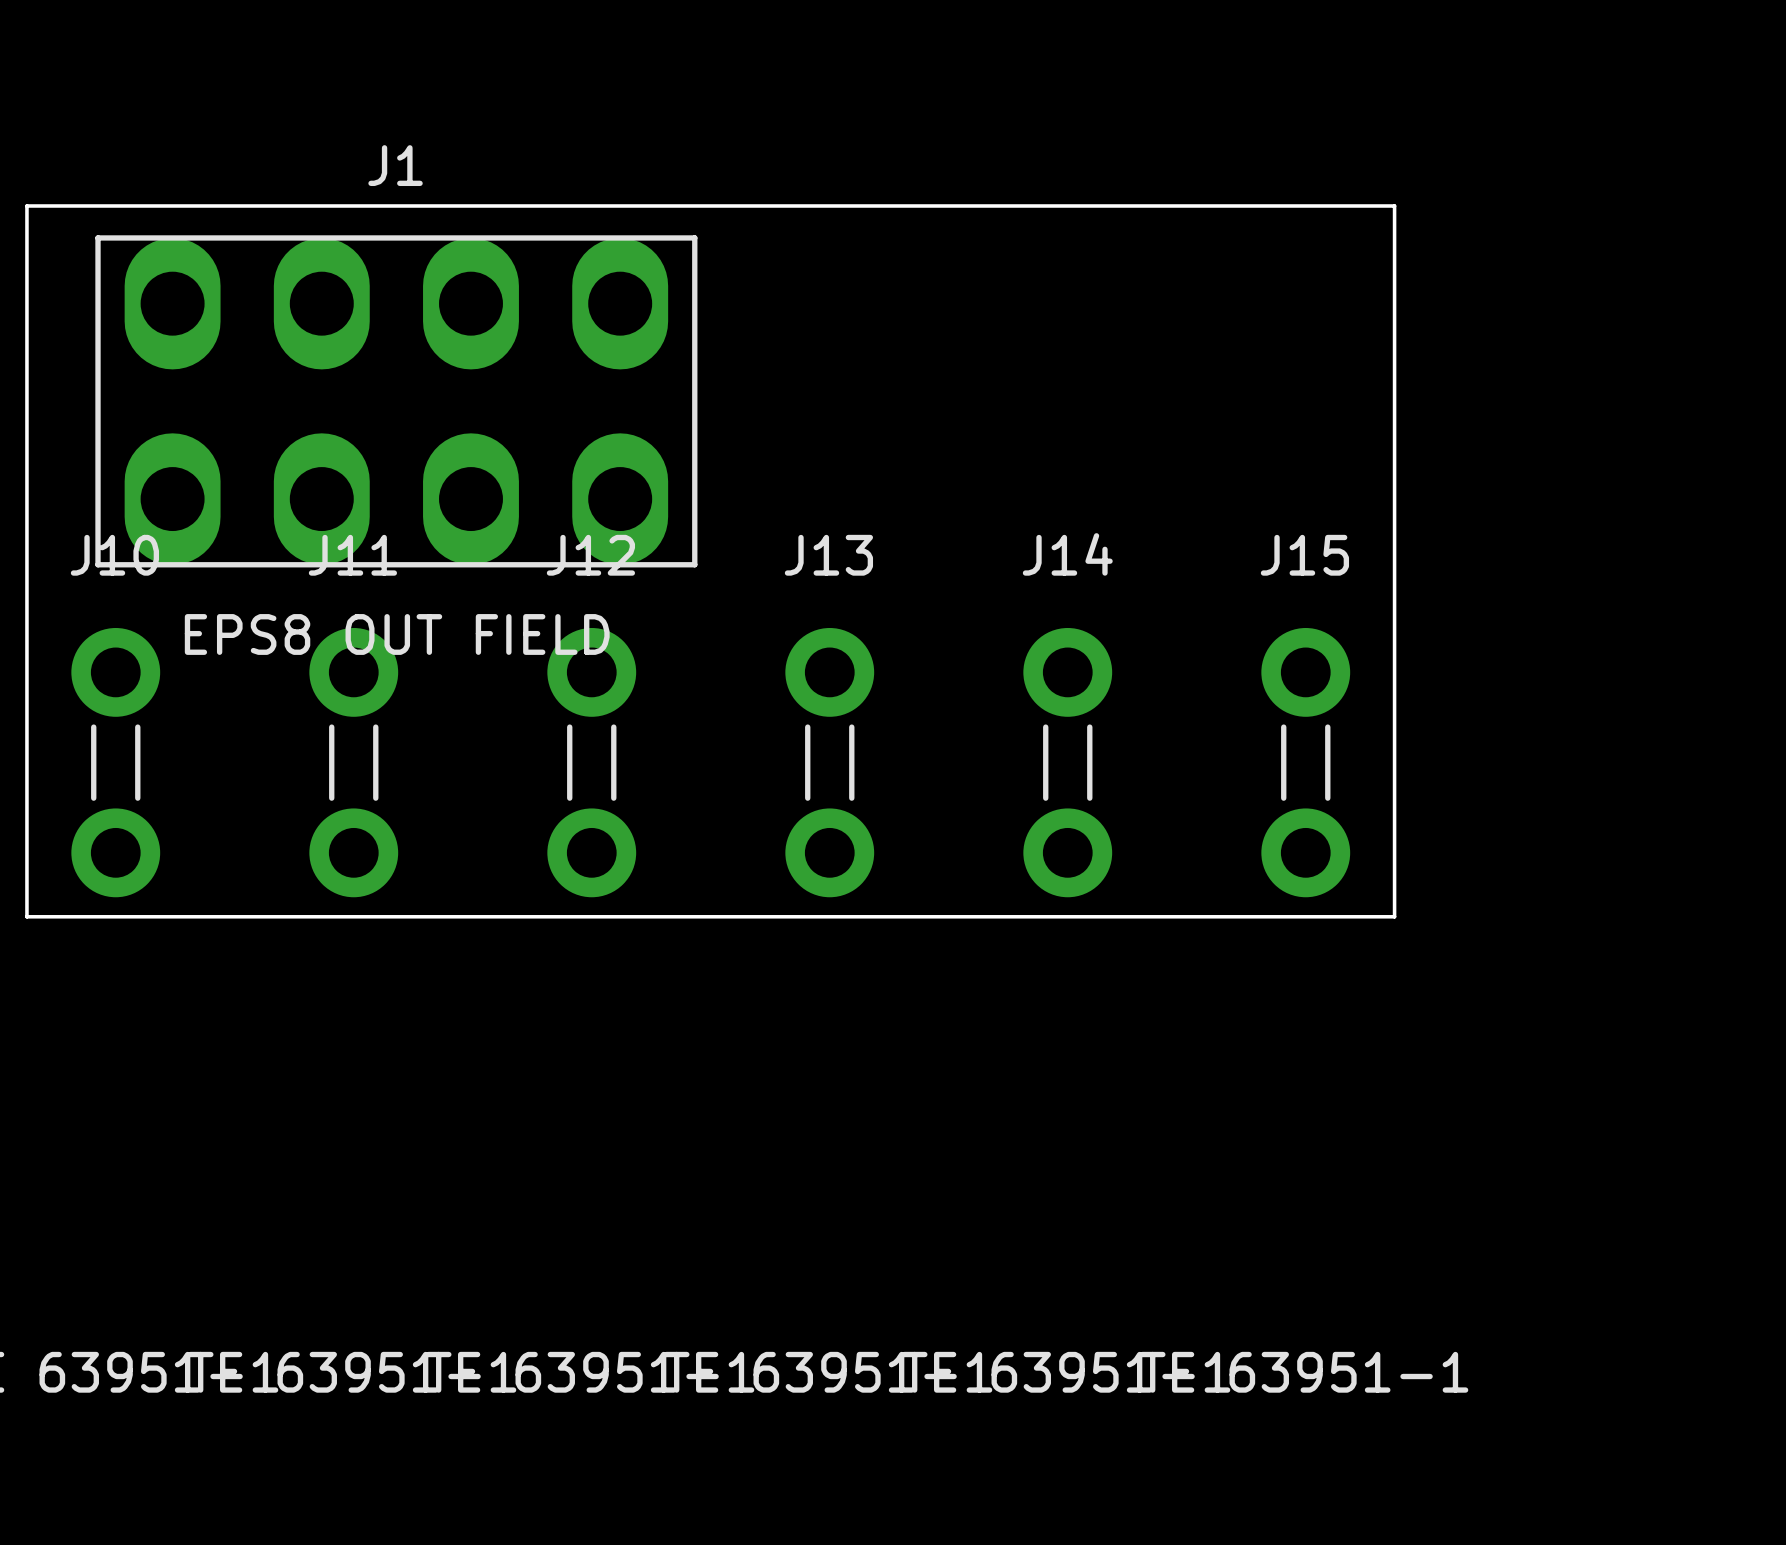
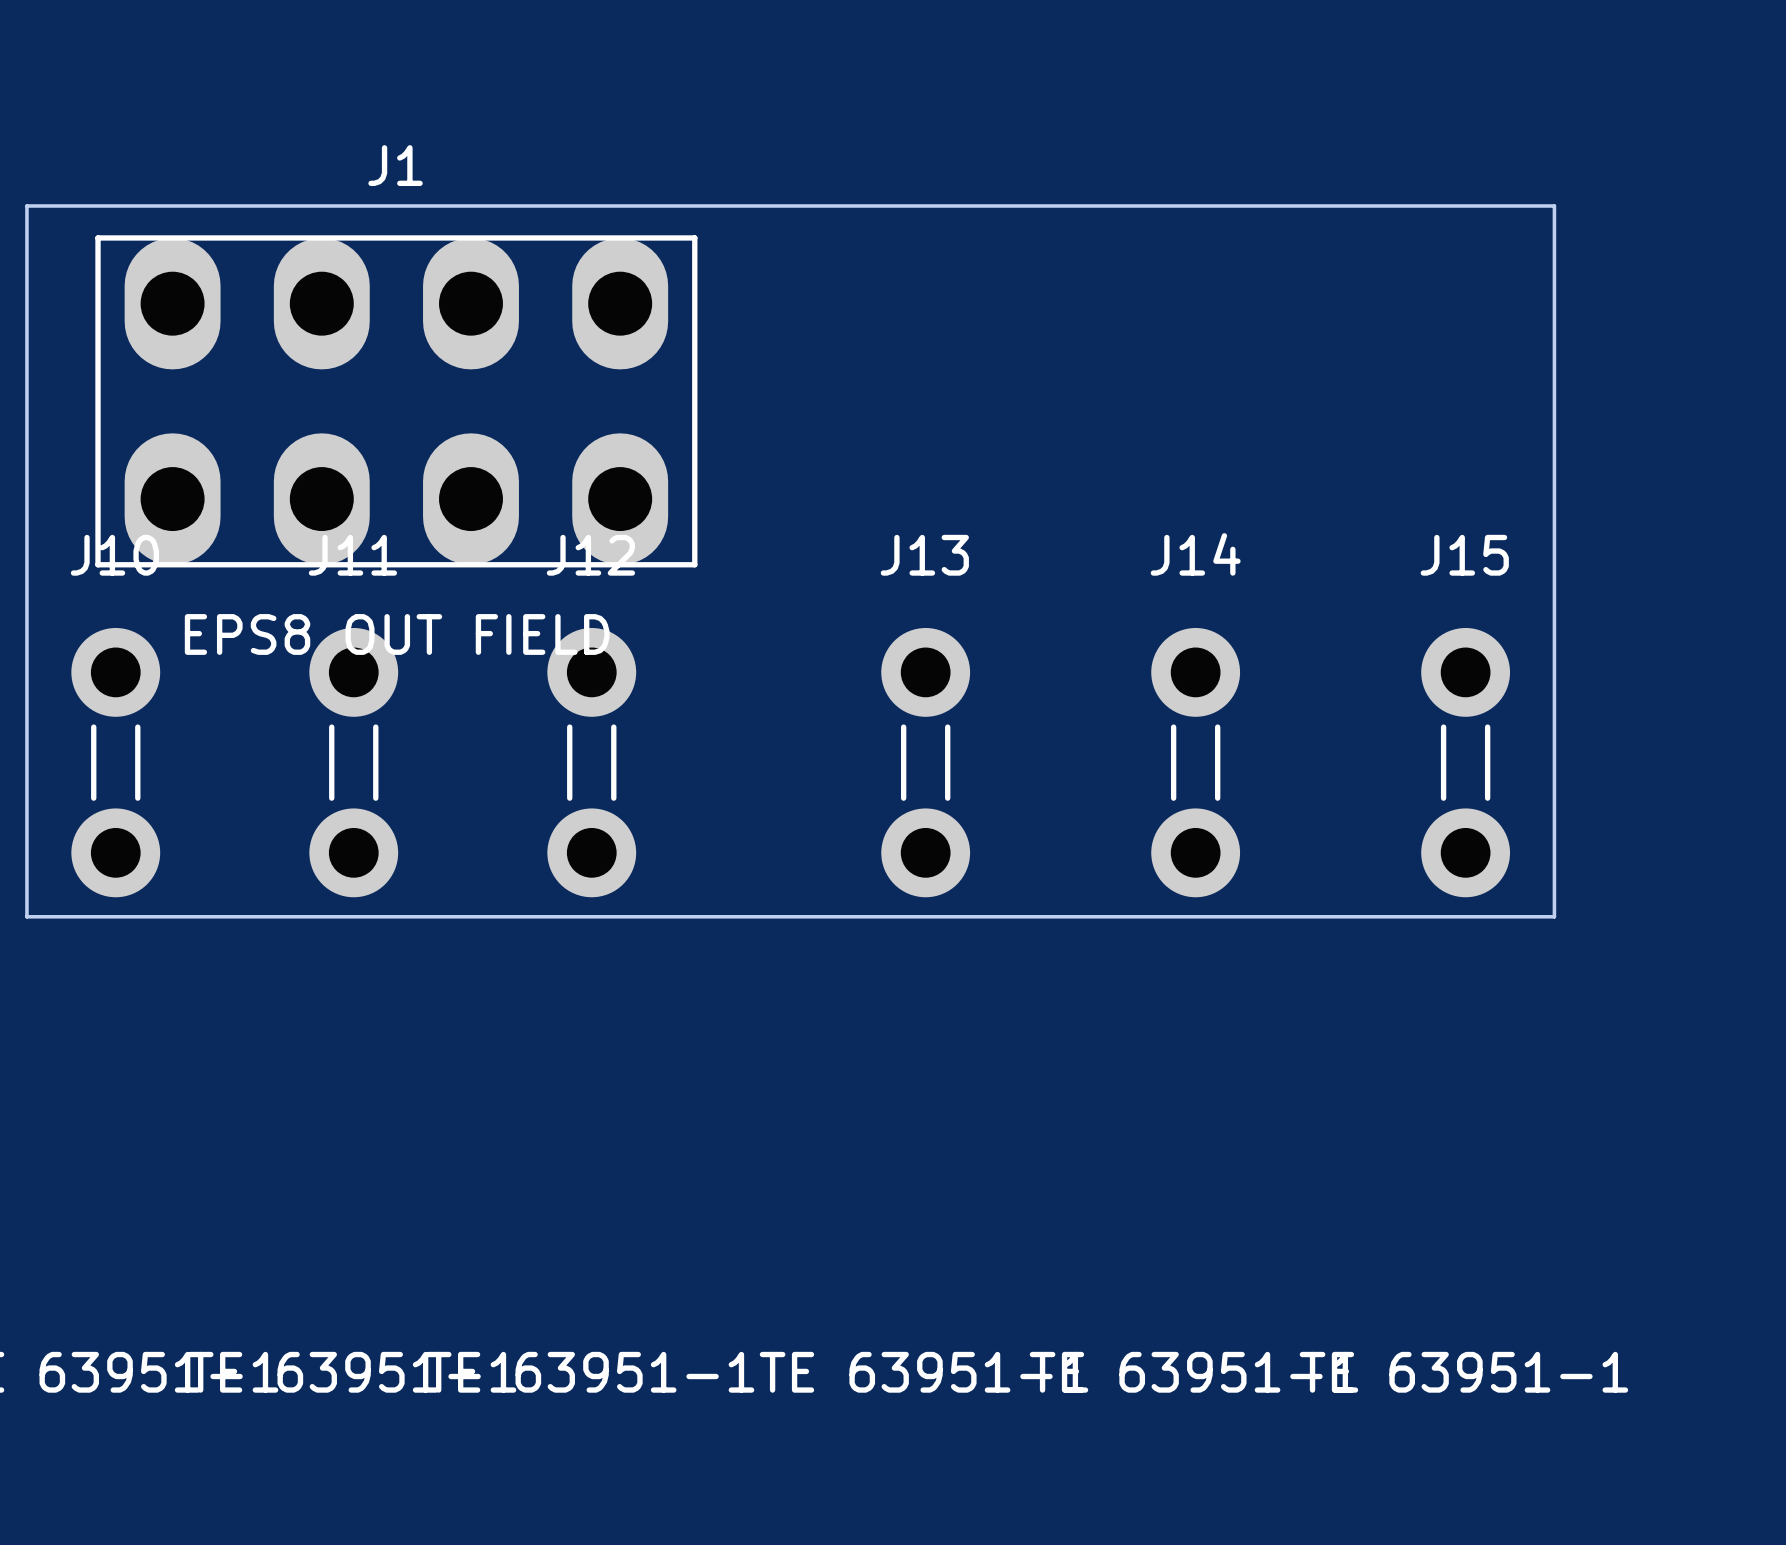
board edge: (1394, 205) (1394, 916) -> (1394, 205) (1554, 205) (1554, 916) (1394, 916)
J13 position: (829, 762) -> (925, 762)
J14 position: (1067, 762) -> (1195, 762)
J15 position: (1305, 762) -> (1465, 762)

